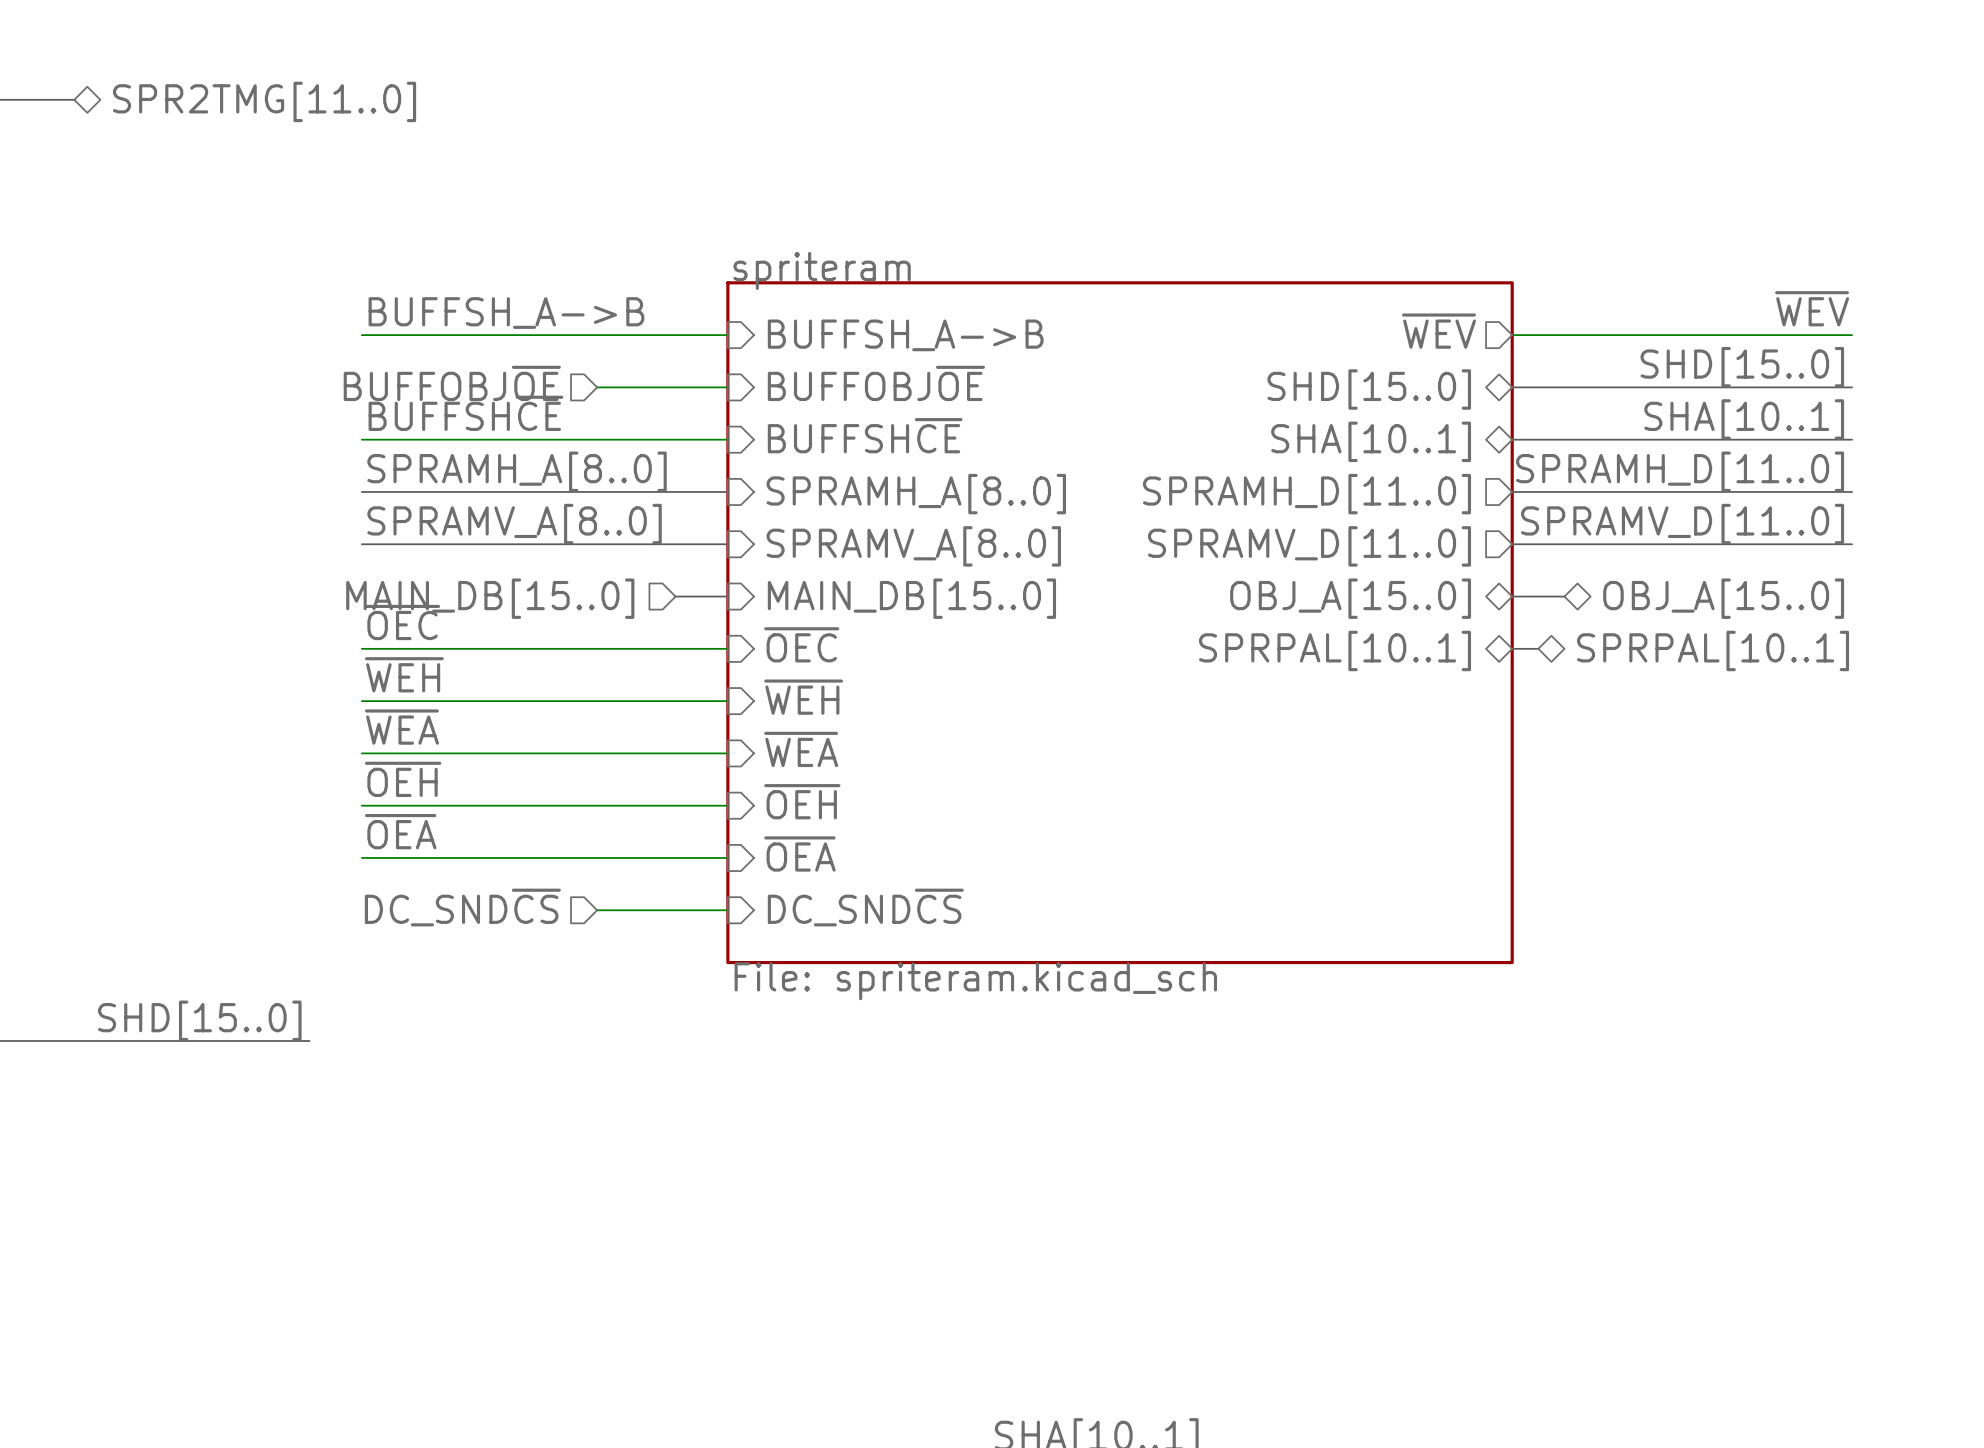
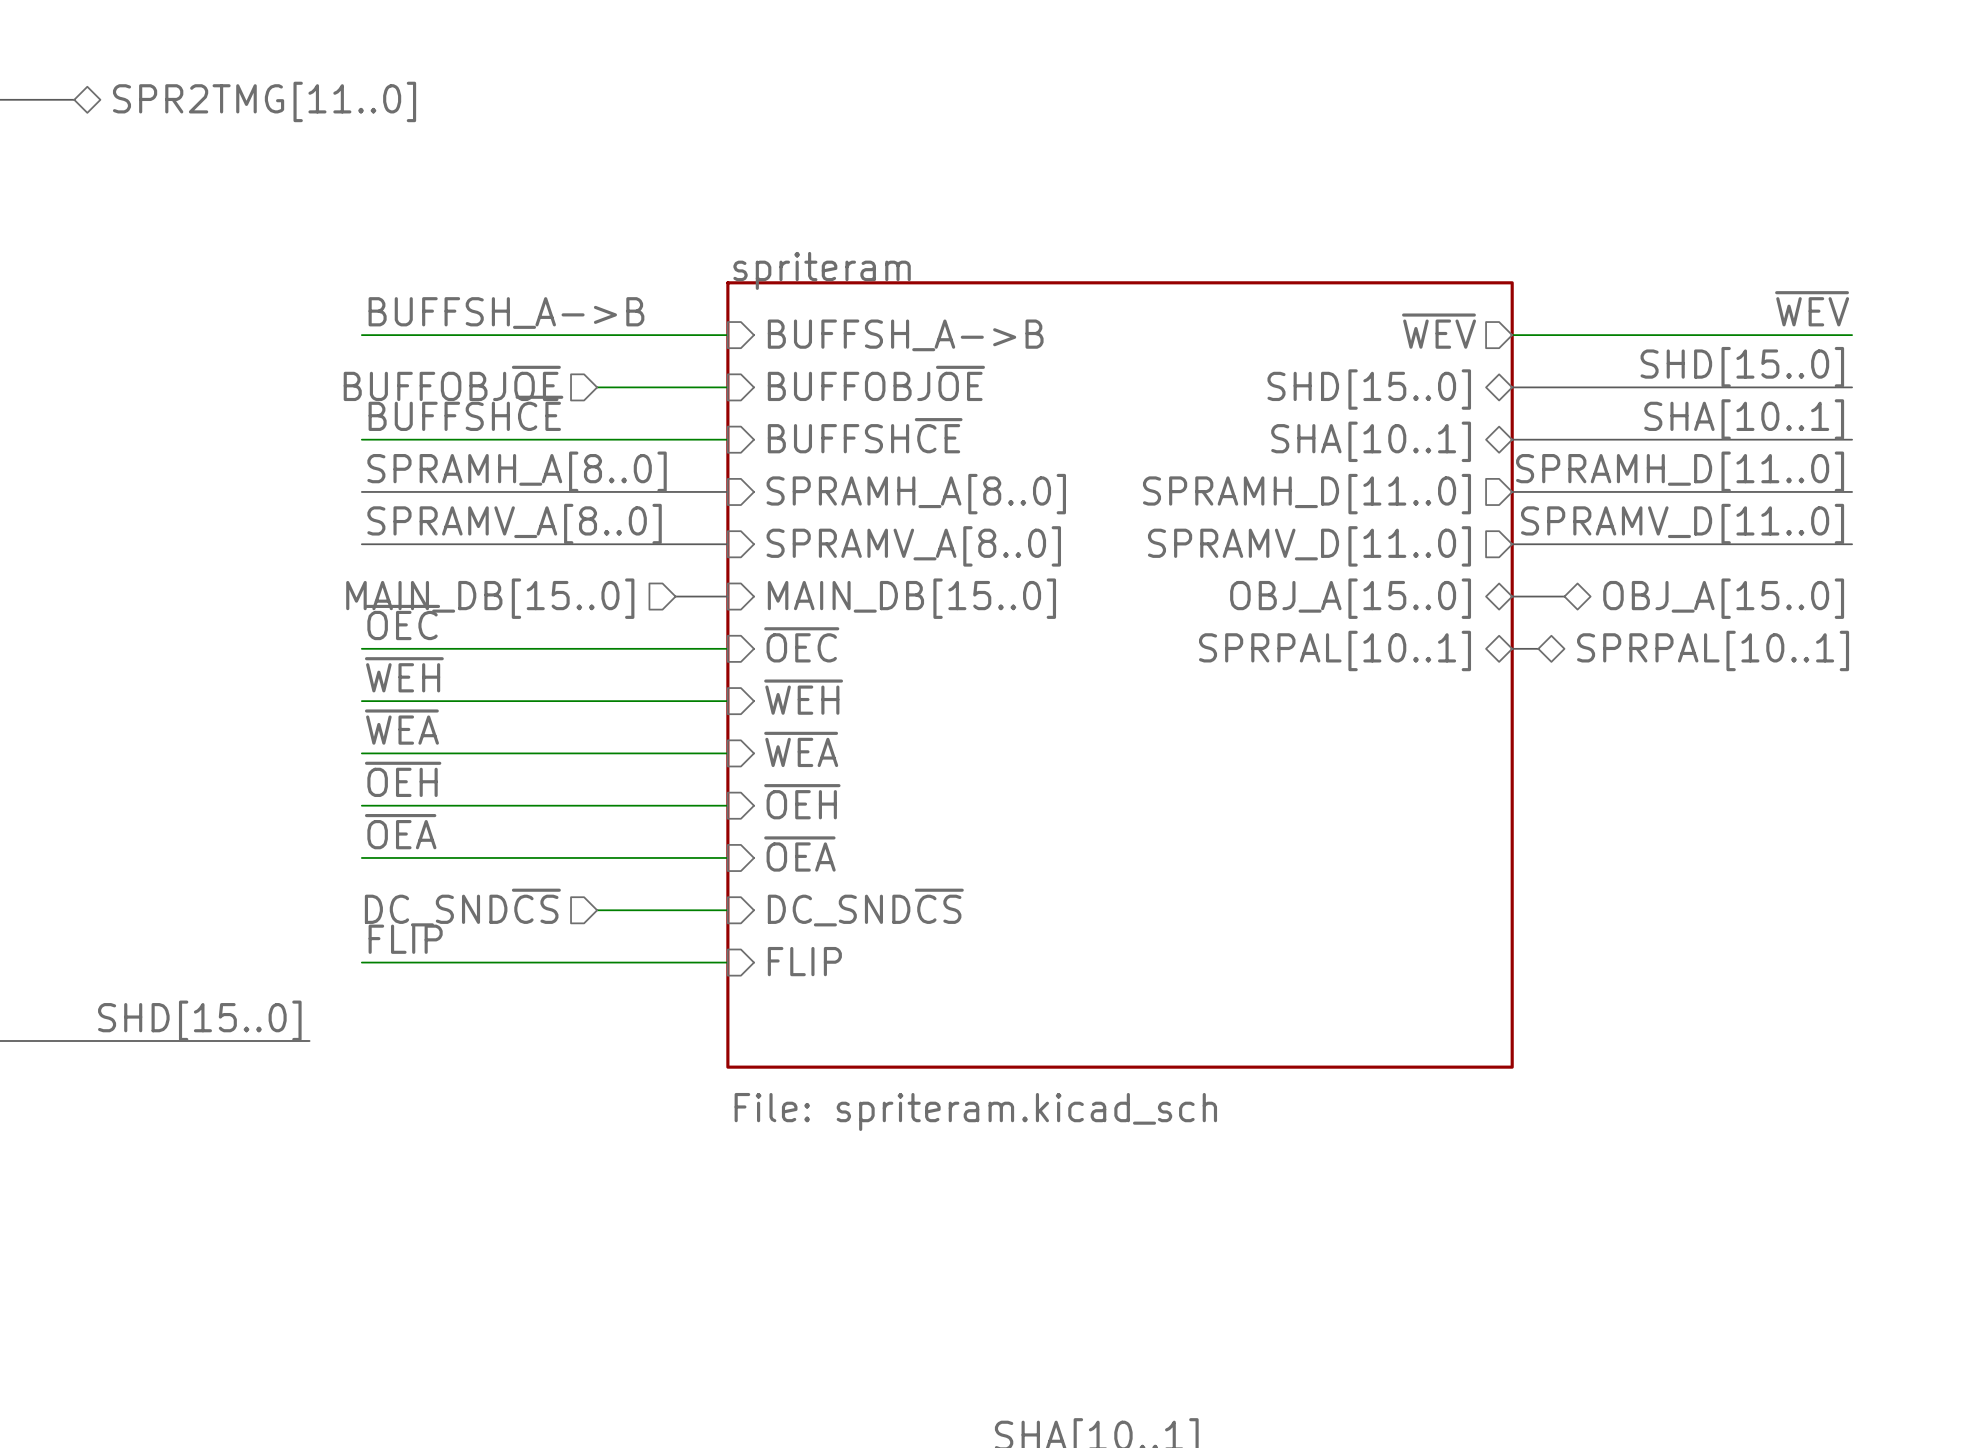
sheet spriteram: File: spriteram.kicad_sch (1120, 622) -> none
sheet spriteram: none -> File: spriteram.kicad_sch (1120, 674)
label: none -> FLIP (405, 939)
sheet pin: none -> FLIP (804, 961)
wire: none -> (361, 962) (727, 962)

